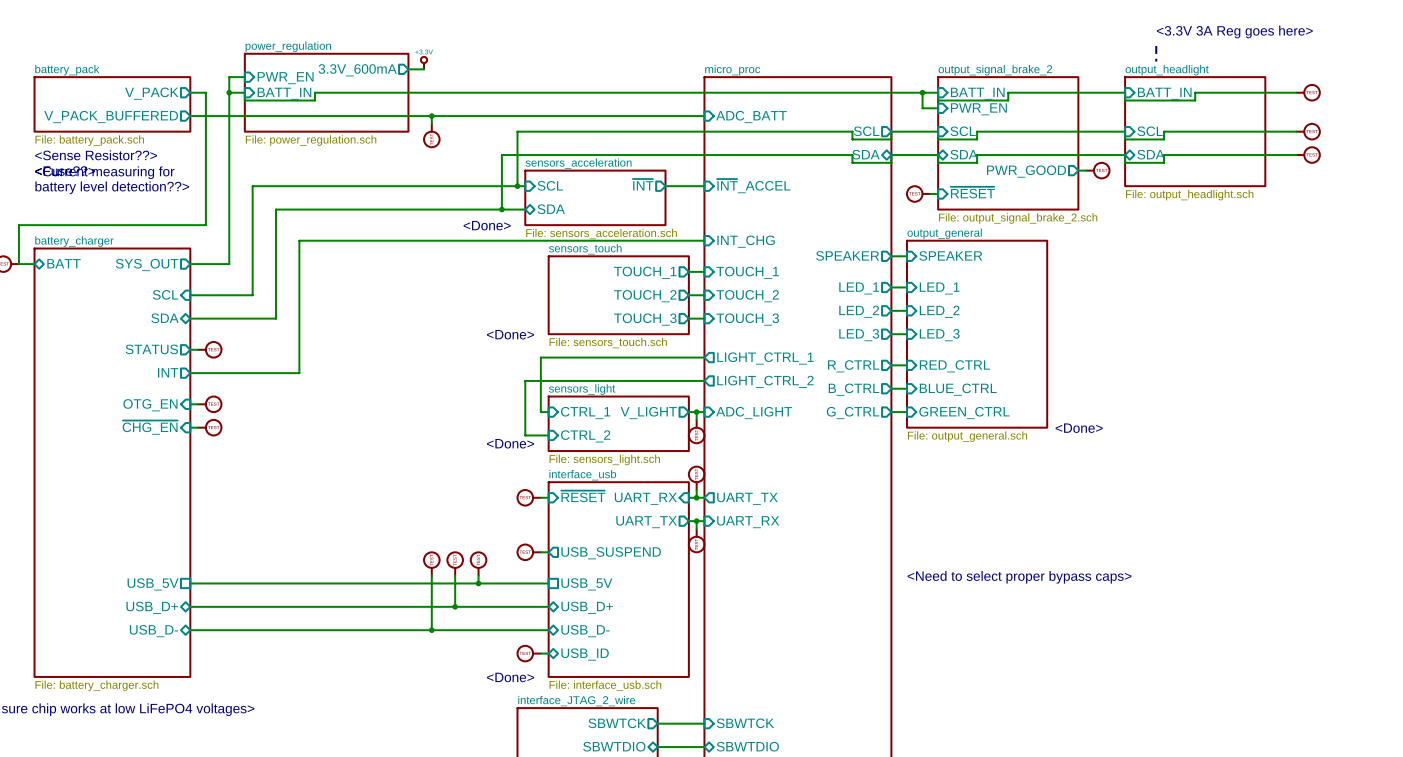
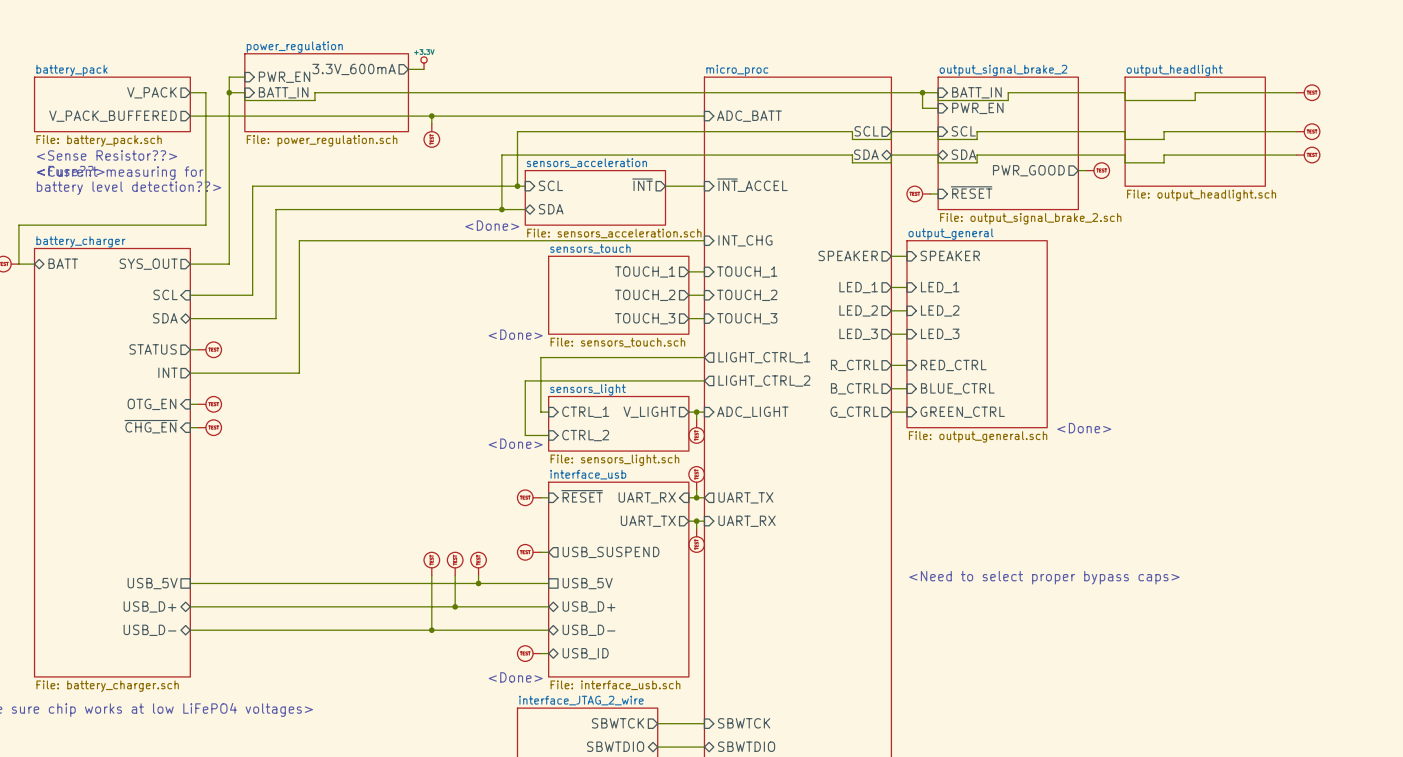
text: <3.3V 3A Reg goes here> (1234, 32) -> none
line: (1156, 45) (1156, 61) -> none
sheet pin: BATT_IN (1164, 93) -> none
sheet pin: SCL (1150, 131) -> none
sheet pin: SDA (1151, 154) -> none

